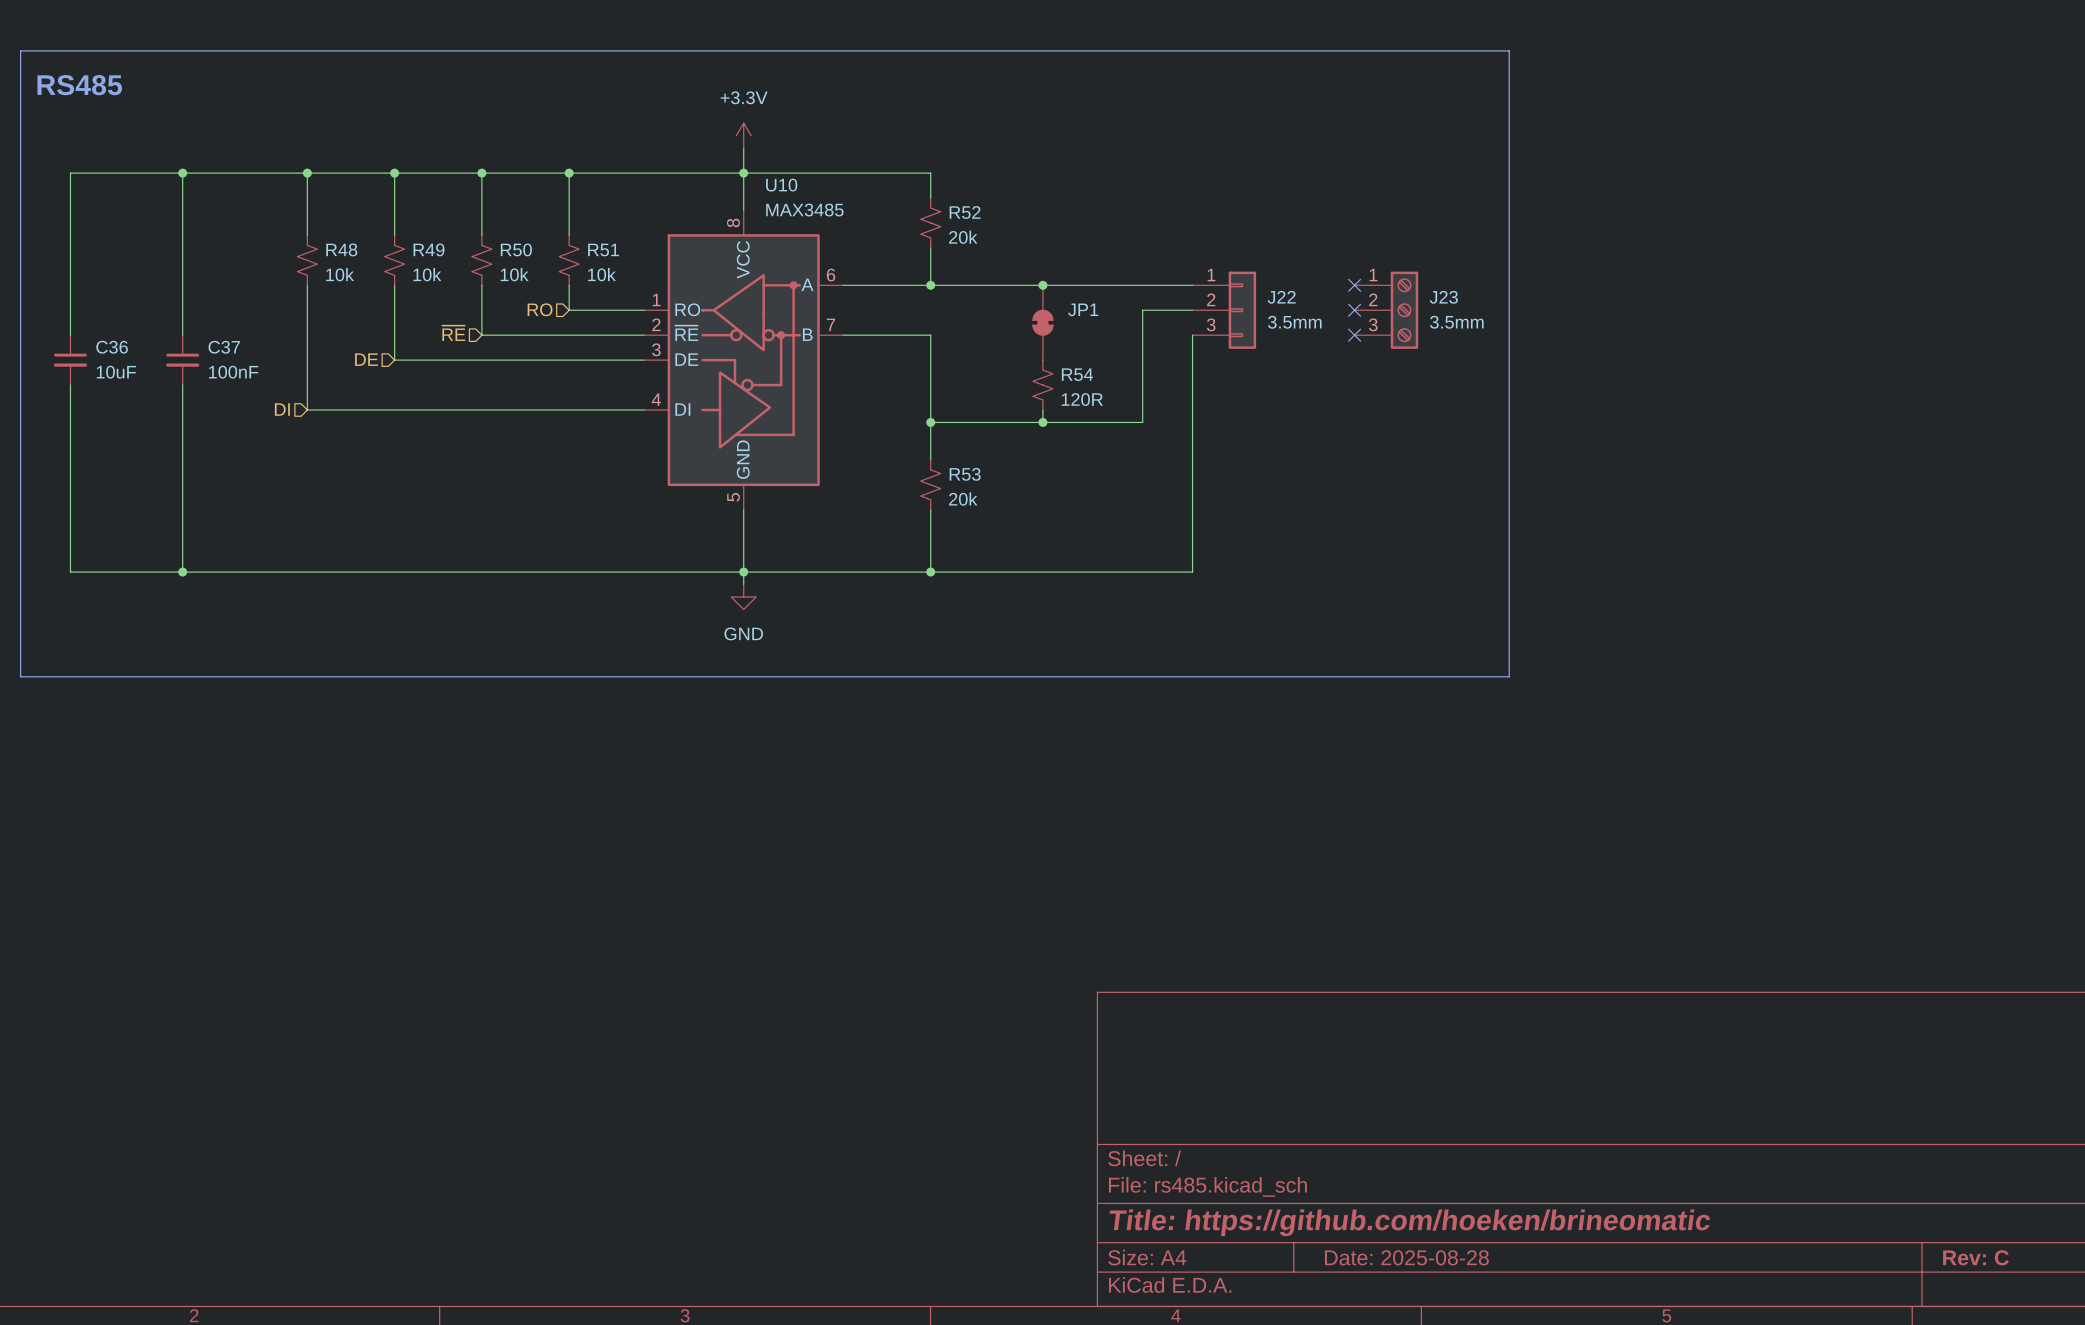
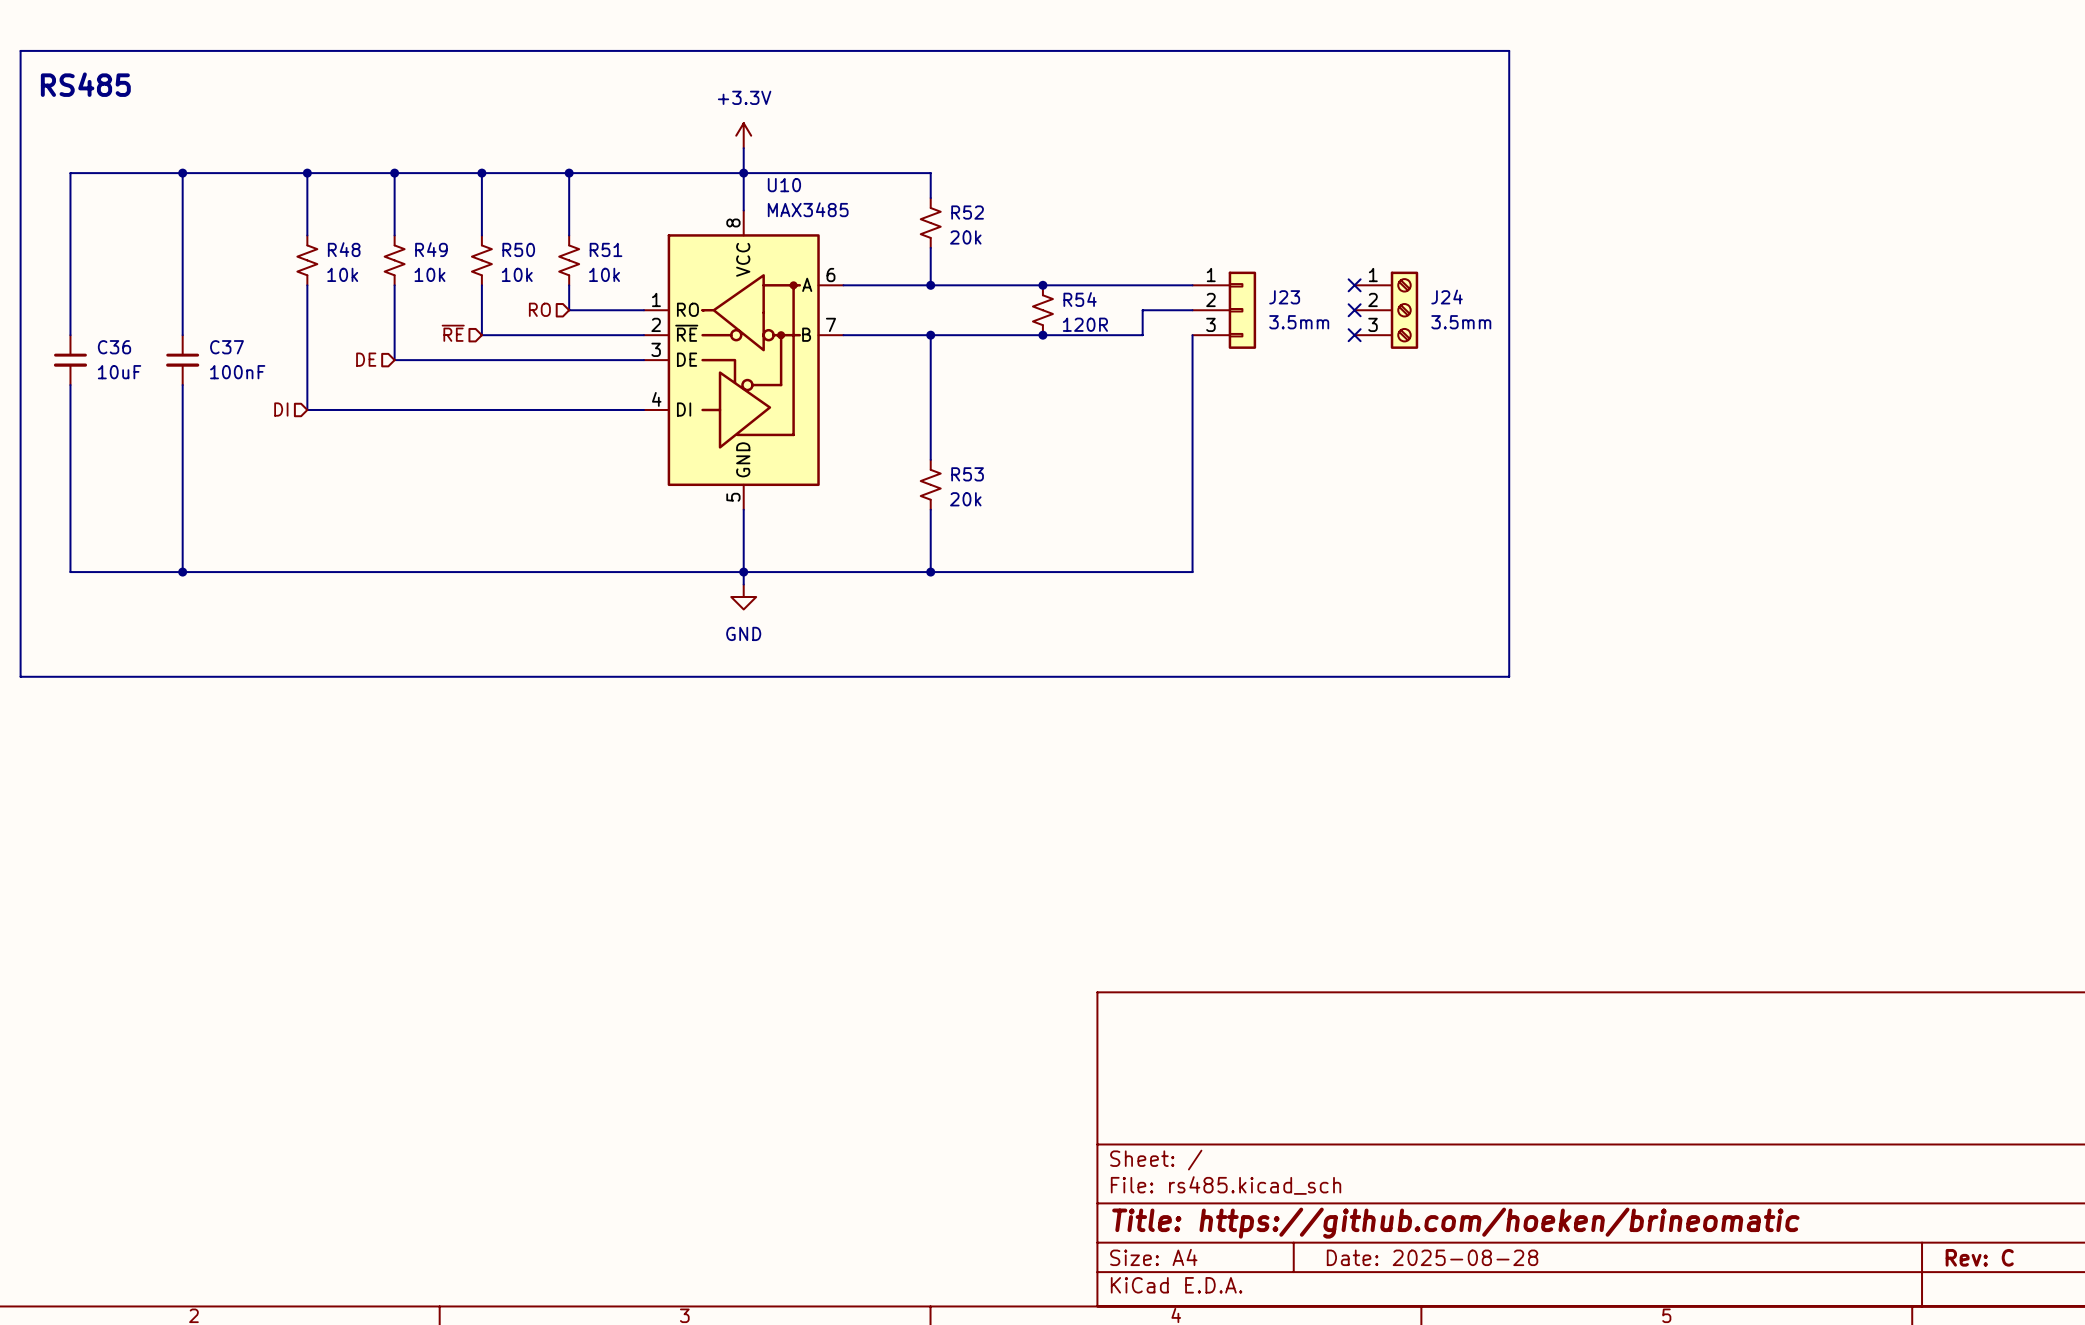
J22 name: J22 (1281, 297) -> J23 (1284, 297)
J23 name: J23 (1443, 297) -> J24 (1447, 297)
JP1: (1042, 322) -> none
junction: none -> (930, 335)
junction: none -> (1042, 335)
wire: (1142, 335) (1142, 422) (930, 422) -> (1142, 335) (930, 335)
R54 position: (1042, 385) -> (1042, 310)
wire: (1042, 409) (1042, 422) -> none
junction: (930, 422) -> none
junction: (1042, 422) -> none

